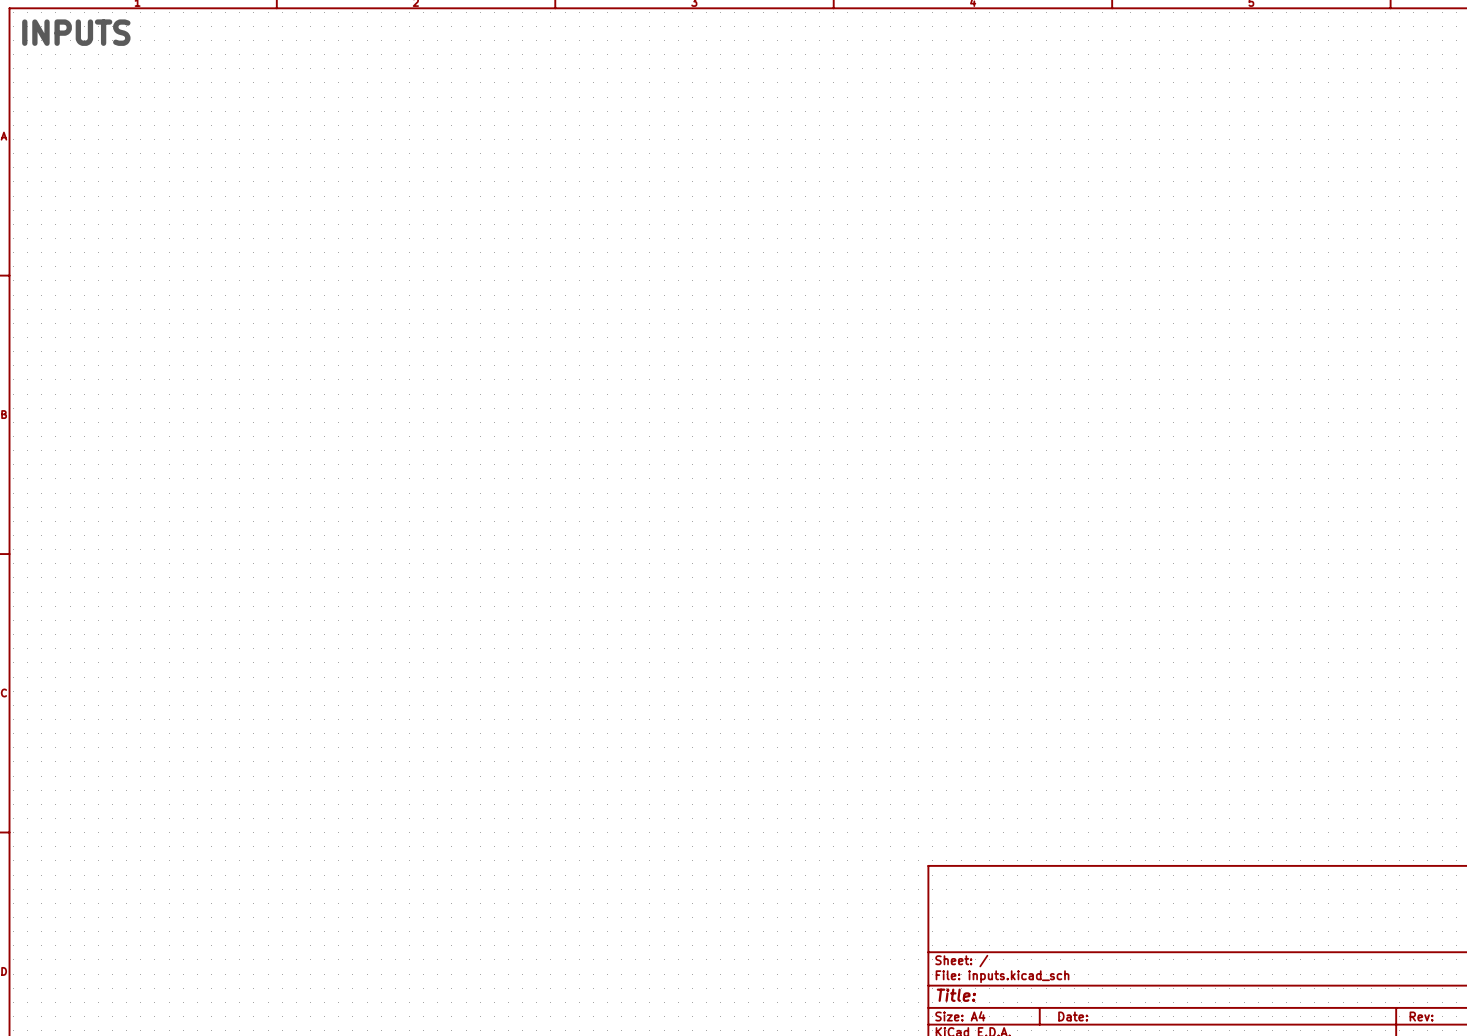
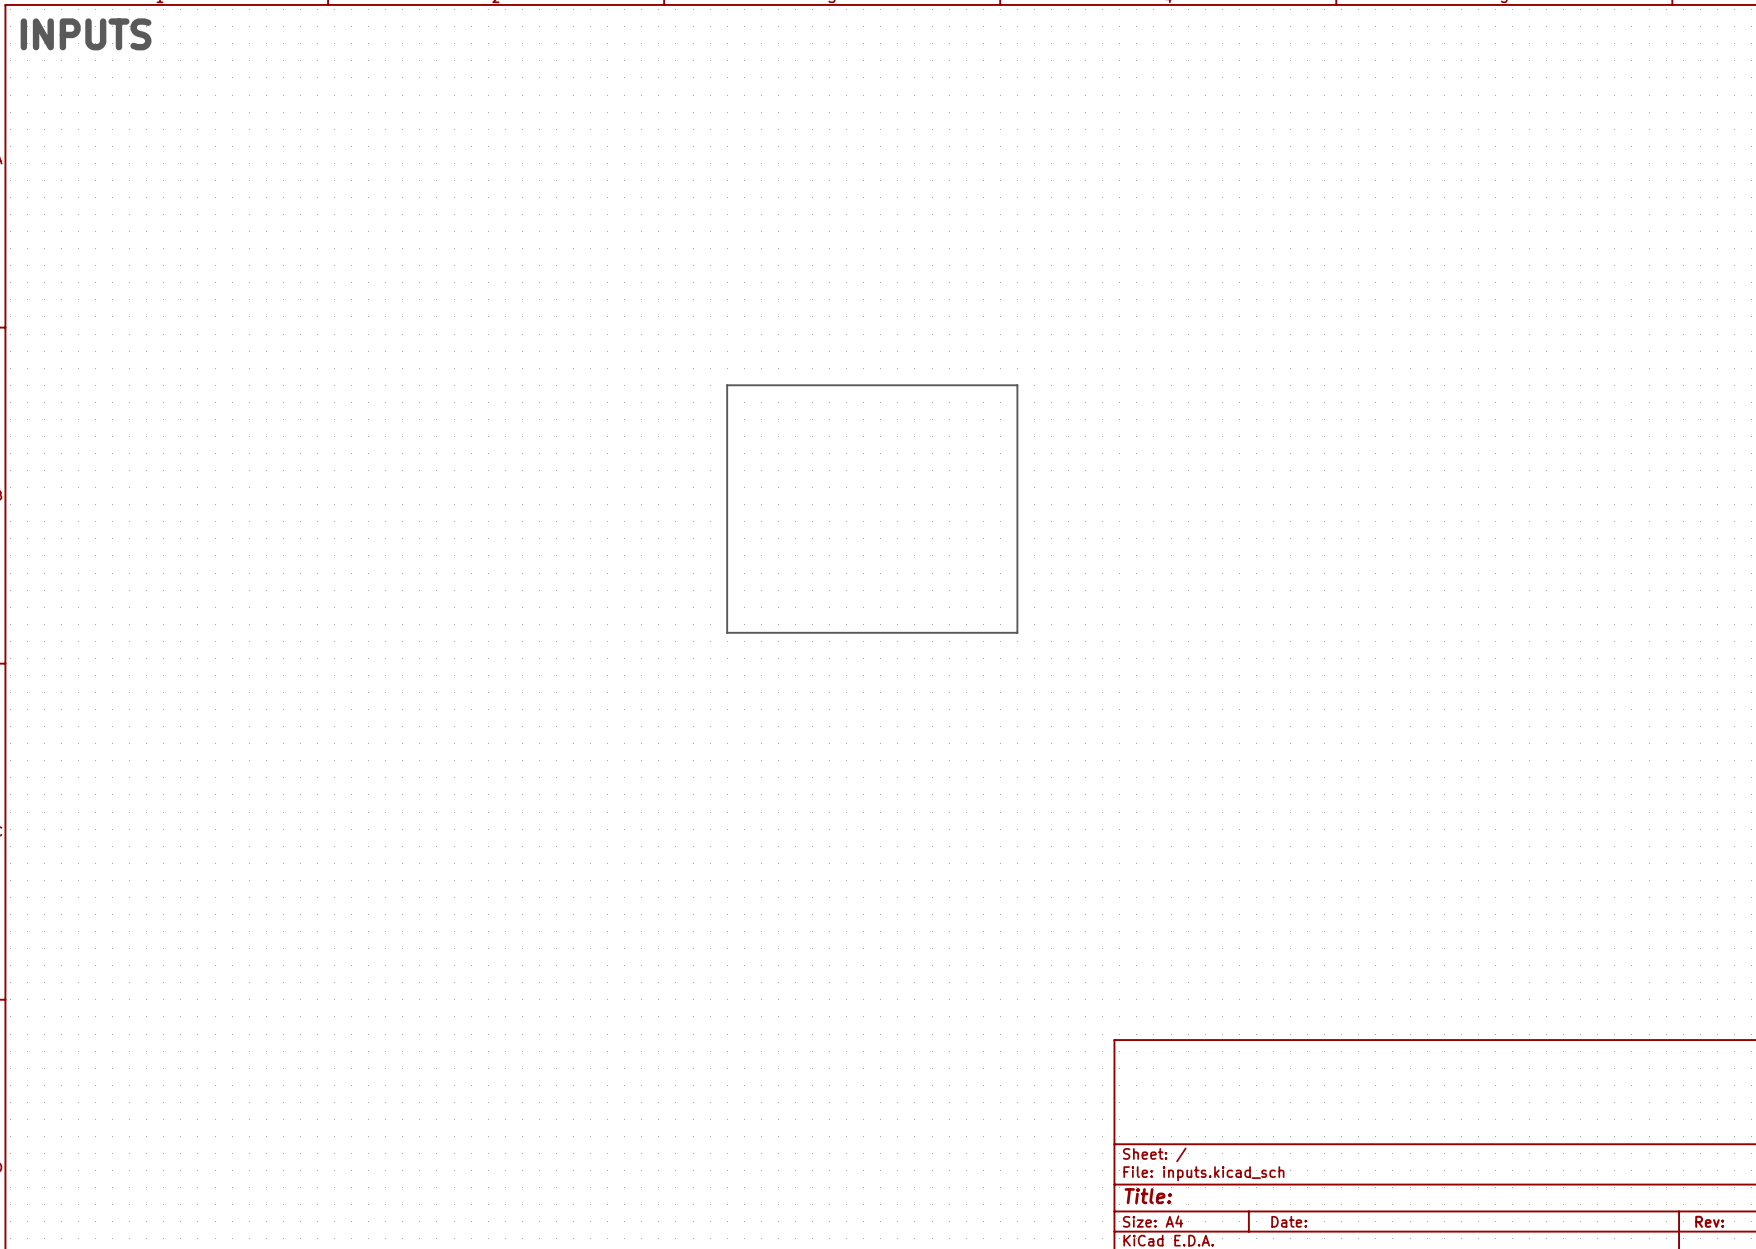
line: none -> (727, 385) (1017, 385) (1017, 632) (727, 632) (727, 385)

